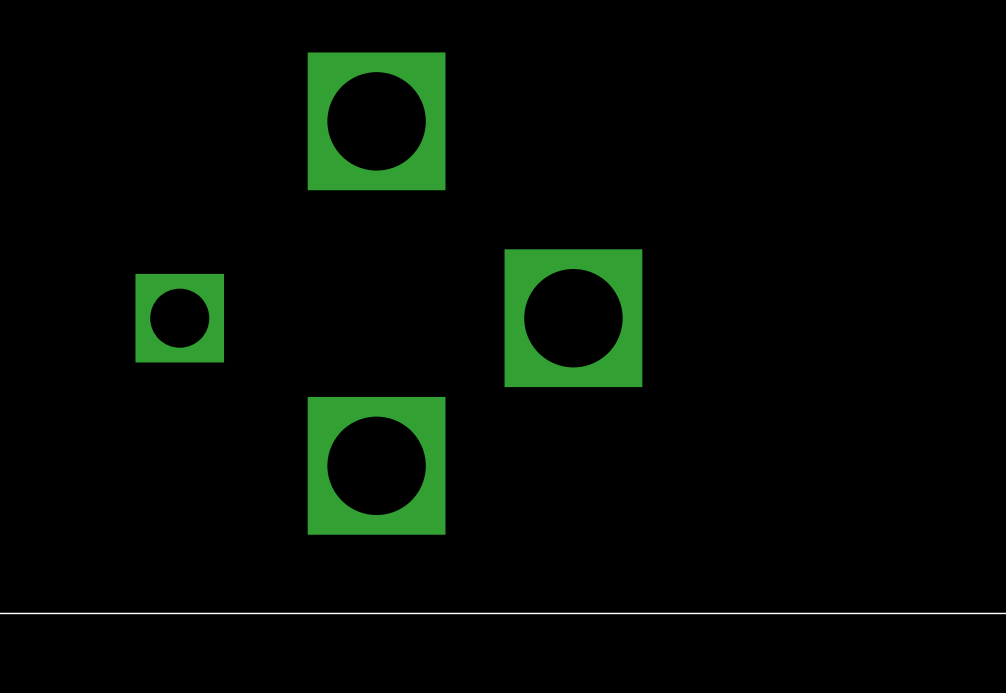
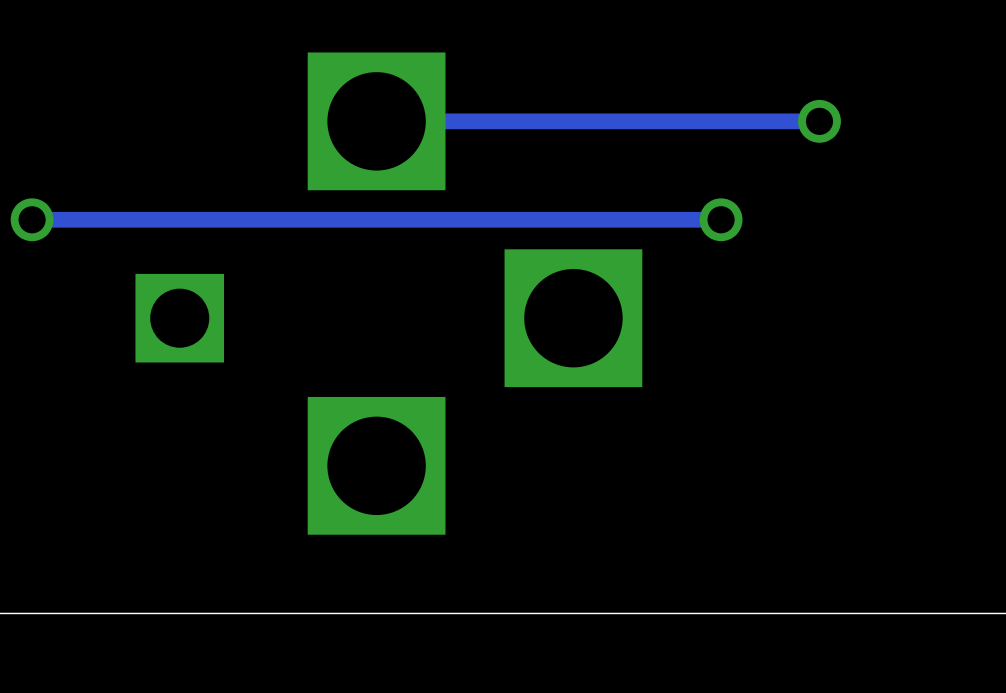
track: none -> (819, 121) (376, 121)
via: none -> (819, 121)
via: none -> (32, 219)
track: none -> (721, 219) (32, 219)
via: none -> (721, 219)

